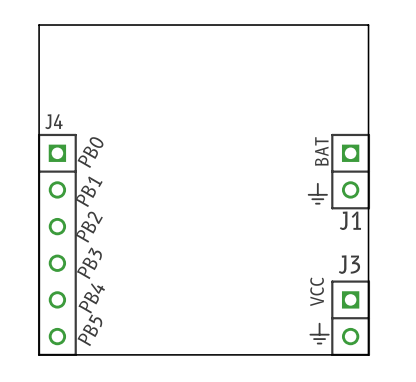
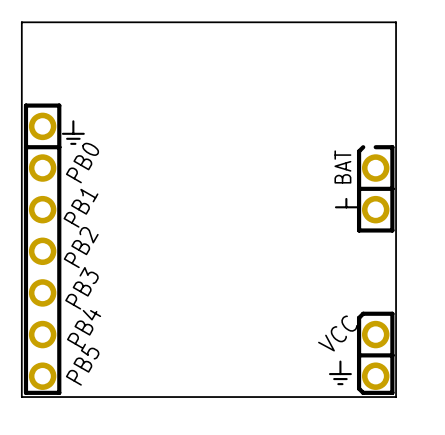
line: none -> (25, 105) (25, 392) (59, 392) (59, 105) (25, 105)
line: none -> (25, 147) (59, 147)
line: none -> (363, 147) (359, 151) (359, 230) (392, 230) (392, 147) (375, 147)
line: none -> (359, 188) (392, 188)
J1: (350, 171) -> none
part: none -> (375, 188)
line: none -> (346, 198) (346, 207)
line: (317, 183) (317, 194) -> (73, 121) (73, 133)
line: none -> (335, 207) (356, 207)
line: (308, 194) (326, 194) -> (62, 133) (83, 133)
line: (312, 199) (323, 199) -> (67, 138) (79, 138)
line: (315, 203) (319, 203) -> (71, 143) (75, 143)
part: none -> (42, 251)
J4: (57, 244) -> none
line: none -> (363, 313) (359, 317) (359, 388) (363, 392) (392, 392) (392, 313) (363, 313)
text rotation: 0° (317, 291) -> 45° clockwise (337, 333)
line: none -> (359, 355) (392, 355)
J3: (350, 318) -> none
part: none -> (375, 355)

